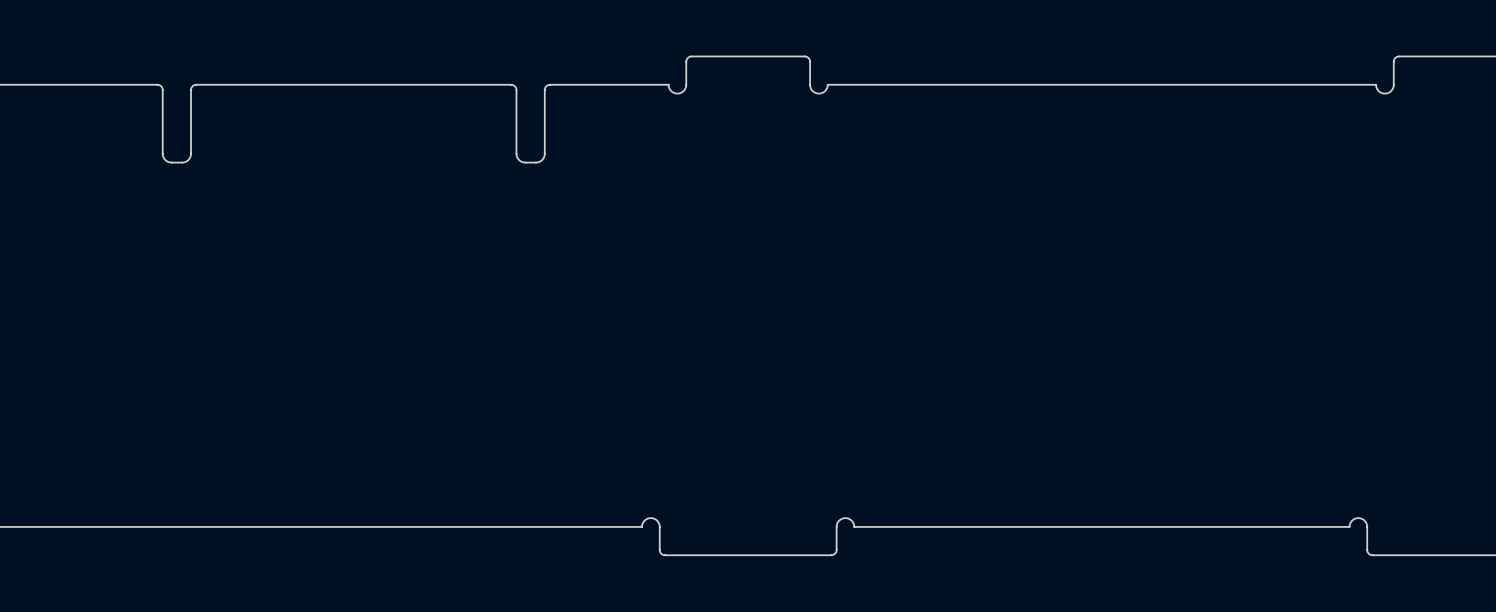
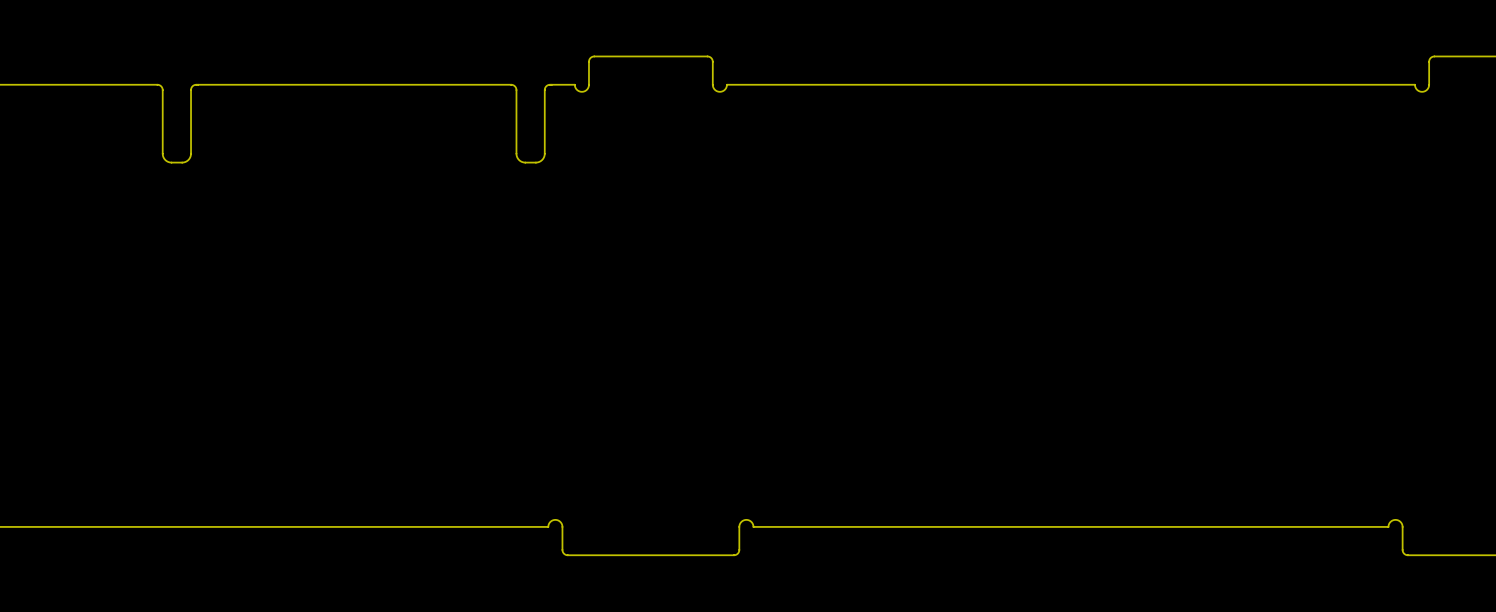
board edge: (691, 56) (686, 61) (685, 87) (679, 93) (672, 91) (668, 84) (574, 84) -> (691, 56) (592, 56) (589, 61) (588, 88) (580, 91) (574, 84)
board edge: (707, 56) (806, 56) (810, 61) (811, 90) (821, 93) (825, 90) (827, 84) -> (707, 56) (712, 60) (712, 85) (718, 91) (724, 90) (726, 84) (827, 84)
board edge: (1434, 56) (1397, 56) (1393, 61) (1391, 90) (1387, 93) (1381, 92) (1376, 84) -> (1434, 56) (1429, 60) (1429, 85) (1424, 91) (1418, 90) (1414, 84) (1376, 84)
board edge: (548, 526) (642, 526) (645, 519) (653, 518) (659, 524) (659, 550) (665, 555) -> (548, 526) (553, 520) (561, 523) (562, 550) (566, 555) (665, 555)
board edge: (854, 526) (852, 521) (847, 518) (838, 521) (836, 550) (832, 555) (734, 555) -> (854, 526) (753, 526) (750, 521) (744, 520) (739, 526) (739, 551) (734, 555)
board edge: (1349, 526) (1355, 518) (1360, 518) (1365, 521) (1367, 550) (1370, 554) (1407, 555) -> (1349, 526) (1388, 526) (1391, 521) (1398, 520) (1402, 526) (1402, 551) (1407, 555)

